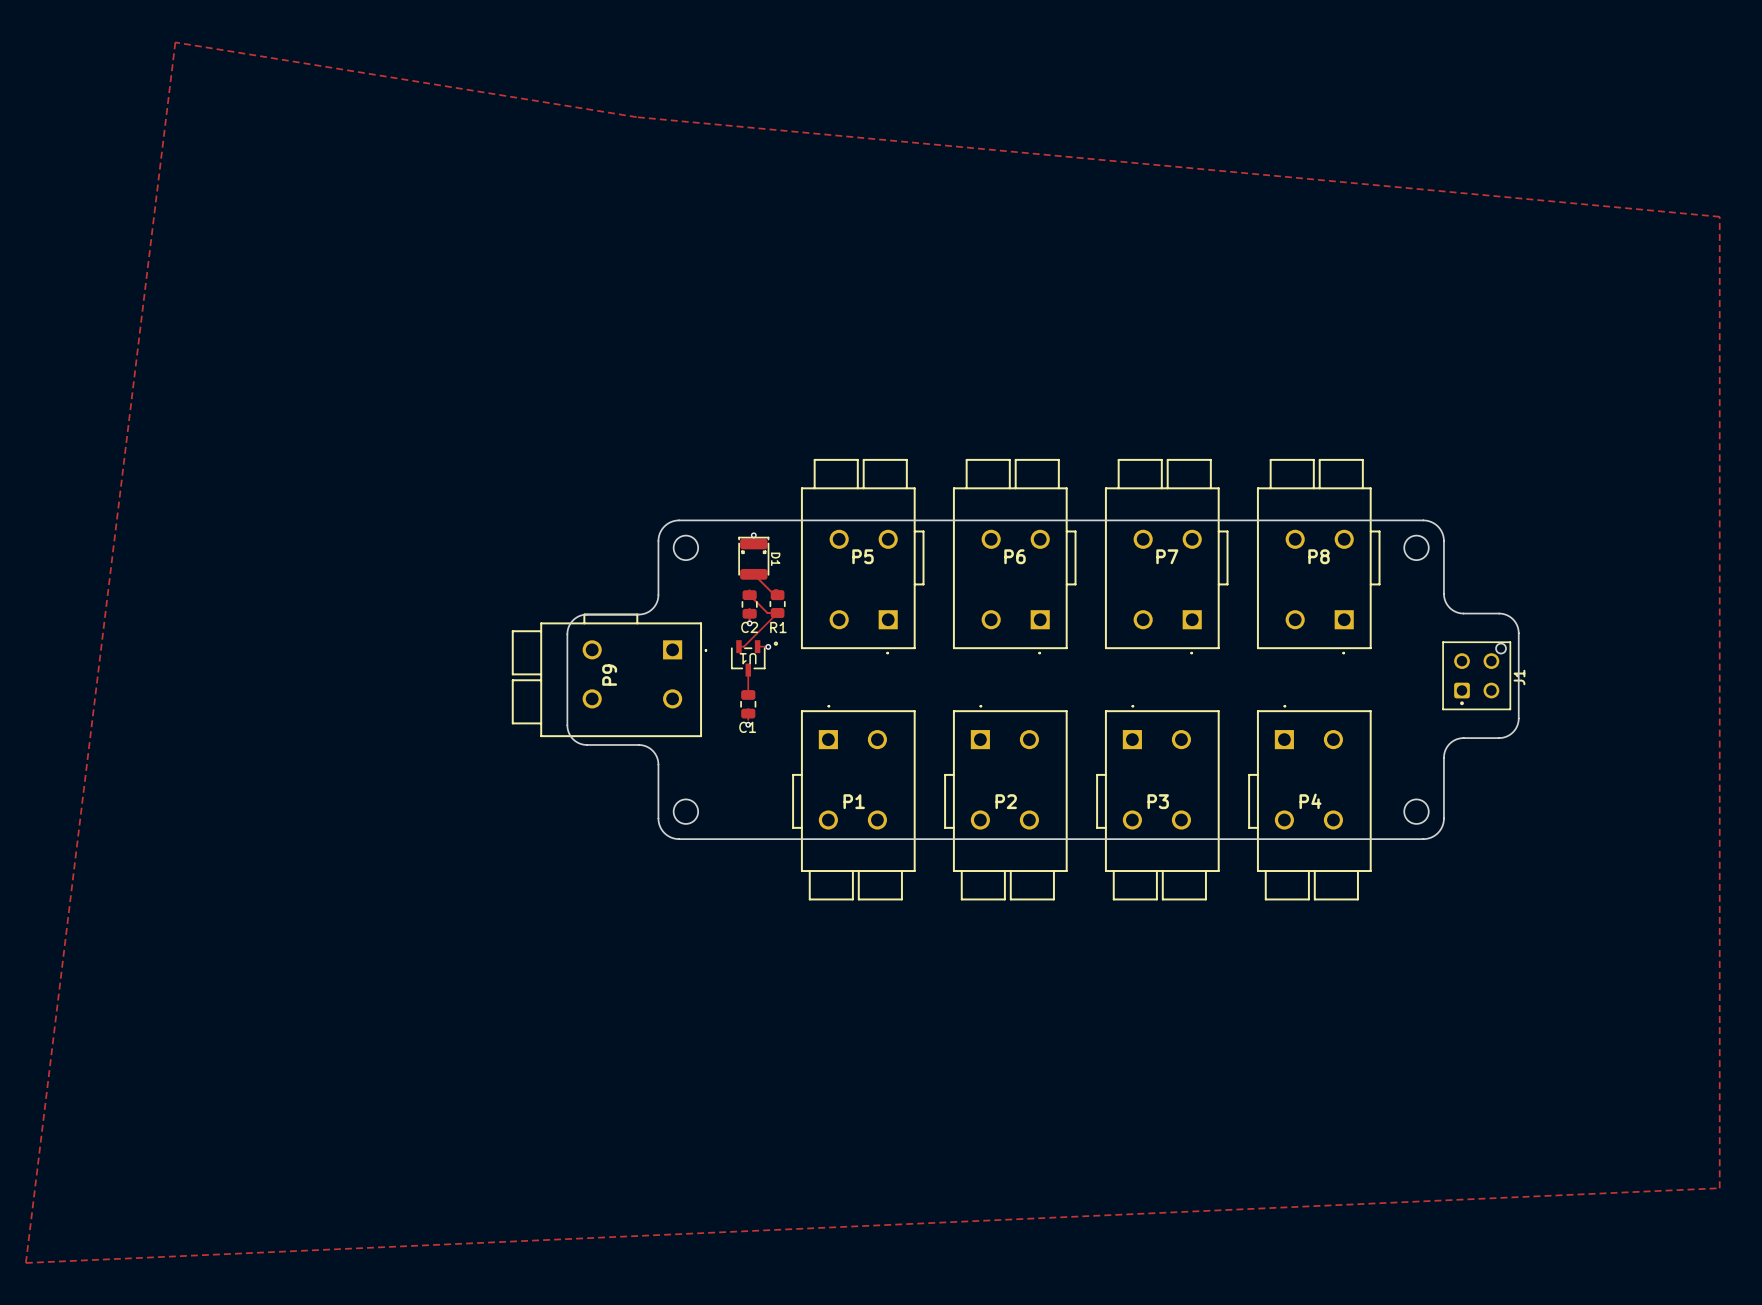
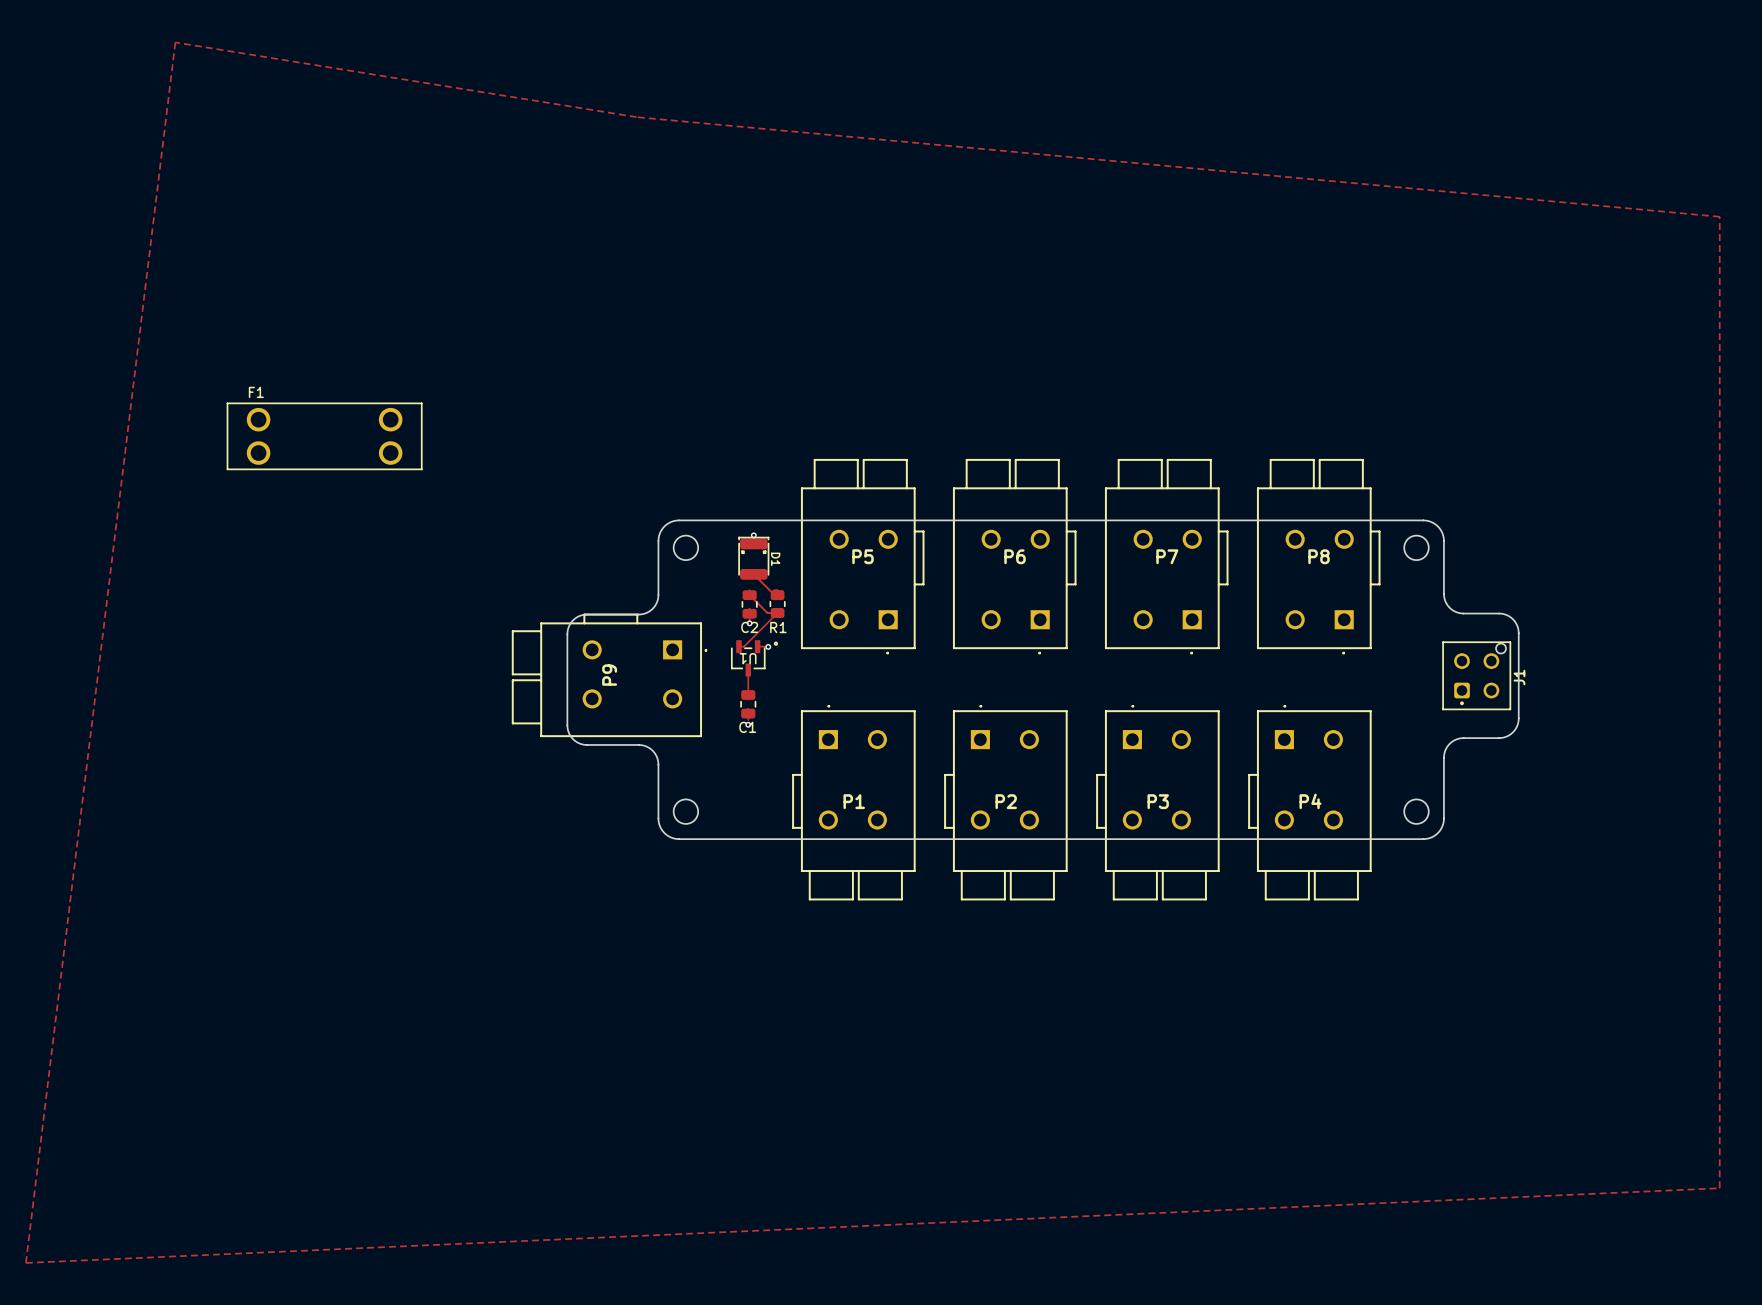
F1: none -> (324, 436)

